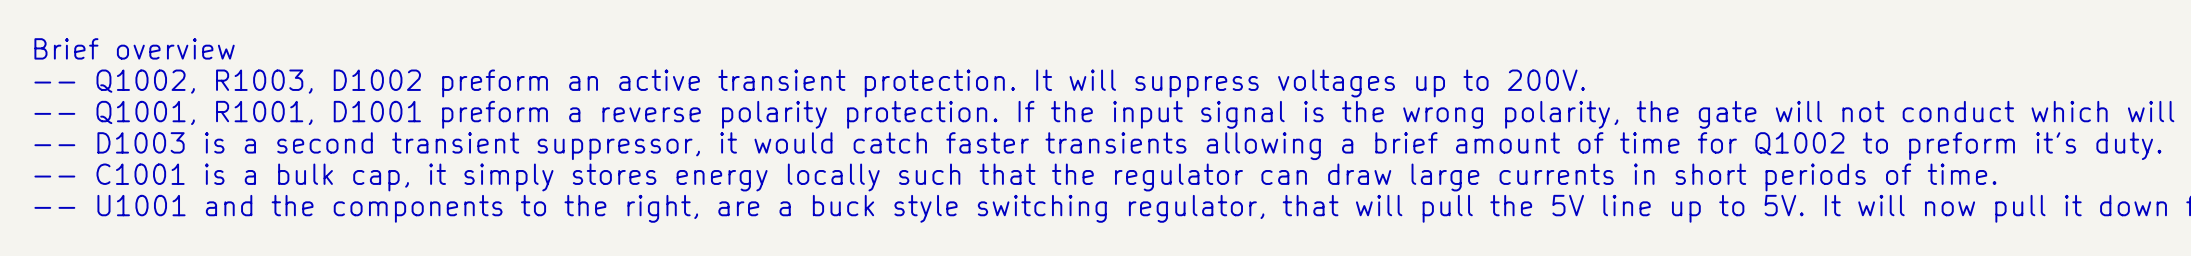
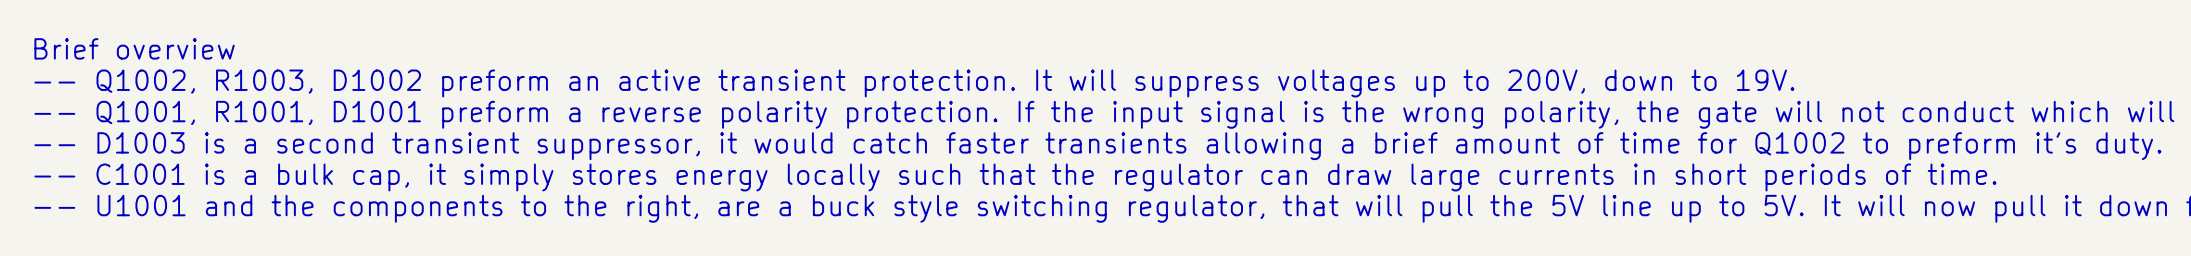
text: -- Q1002, R1003, D1002 preform an active transient protection. It will suppress voltages up to 200V. (809, 83) -> -- Q1002, R1003, D1002 preform an active transient protection. It will suppress voltages up to 200V, down to 19V. (914, 83)

